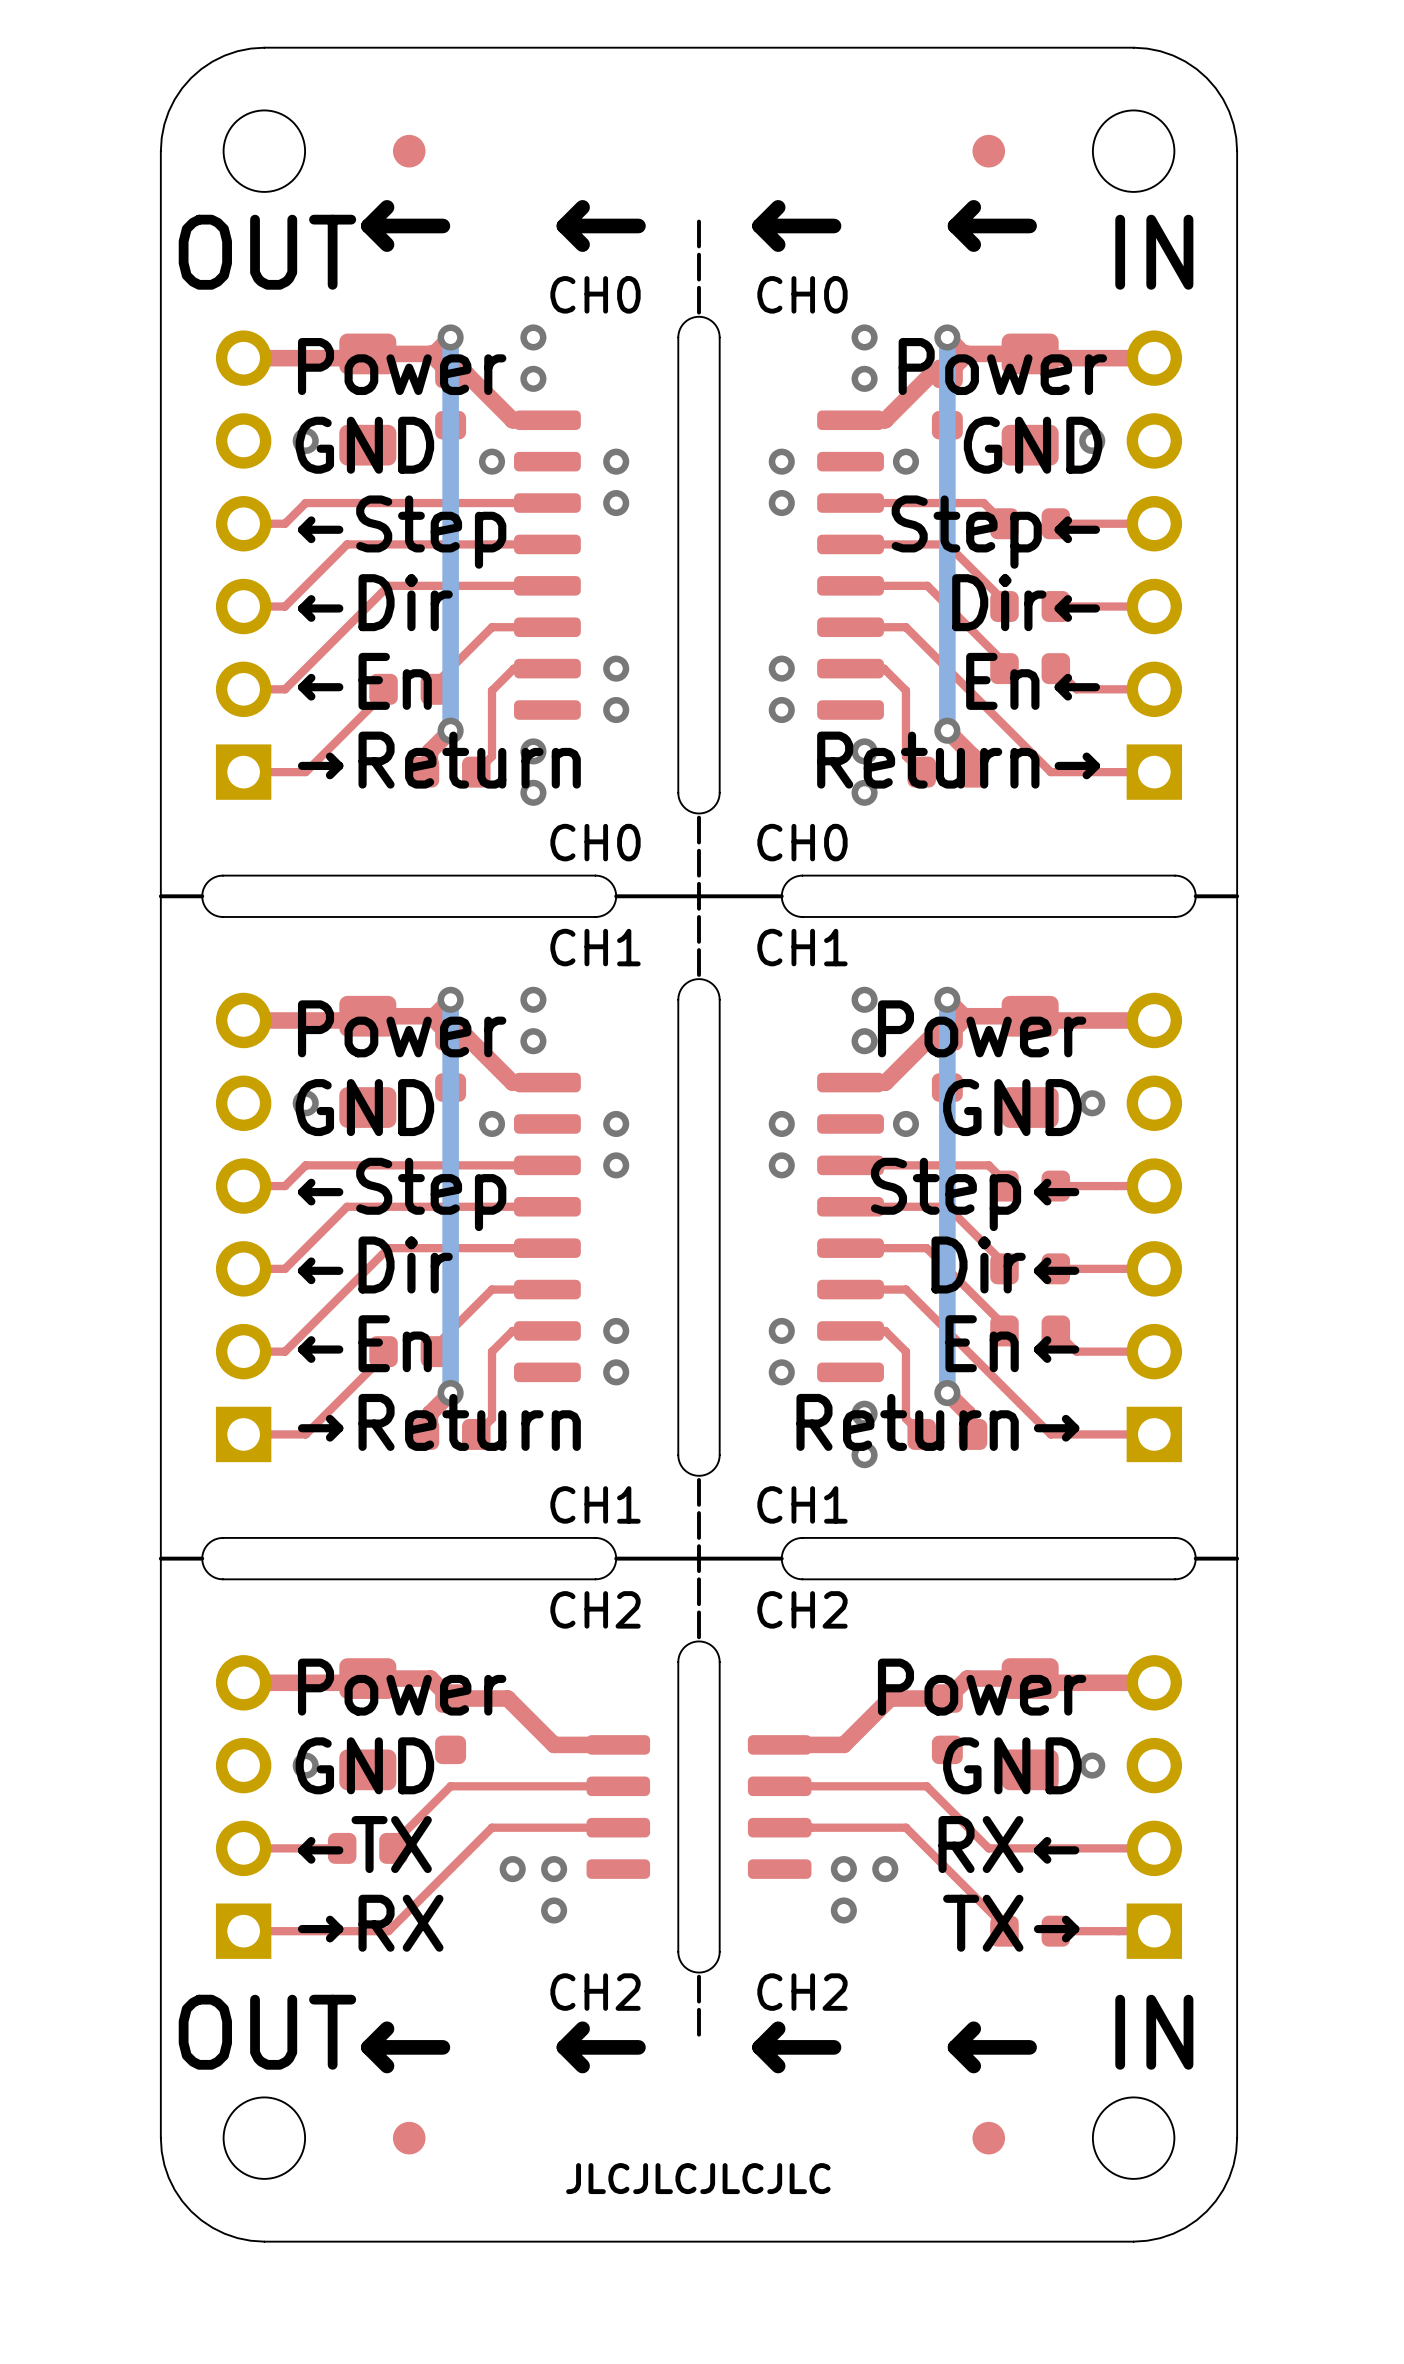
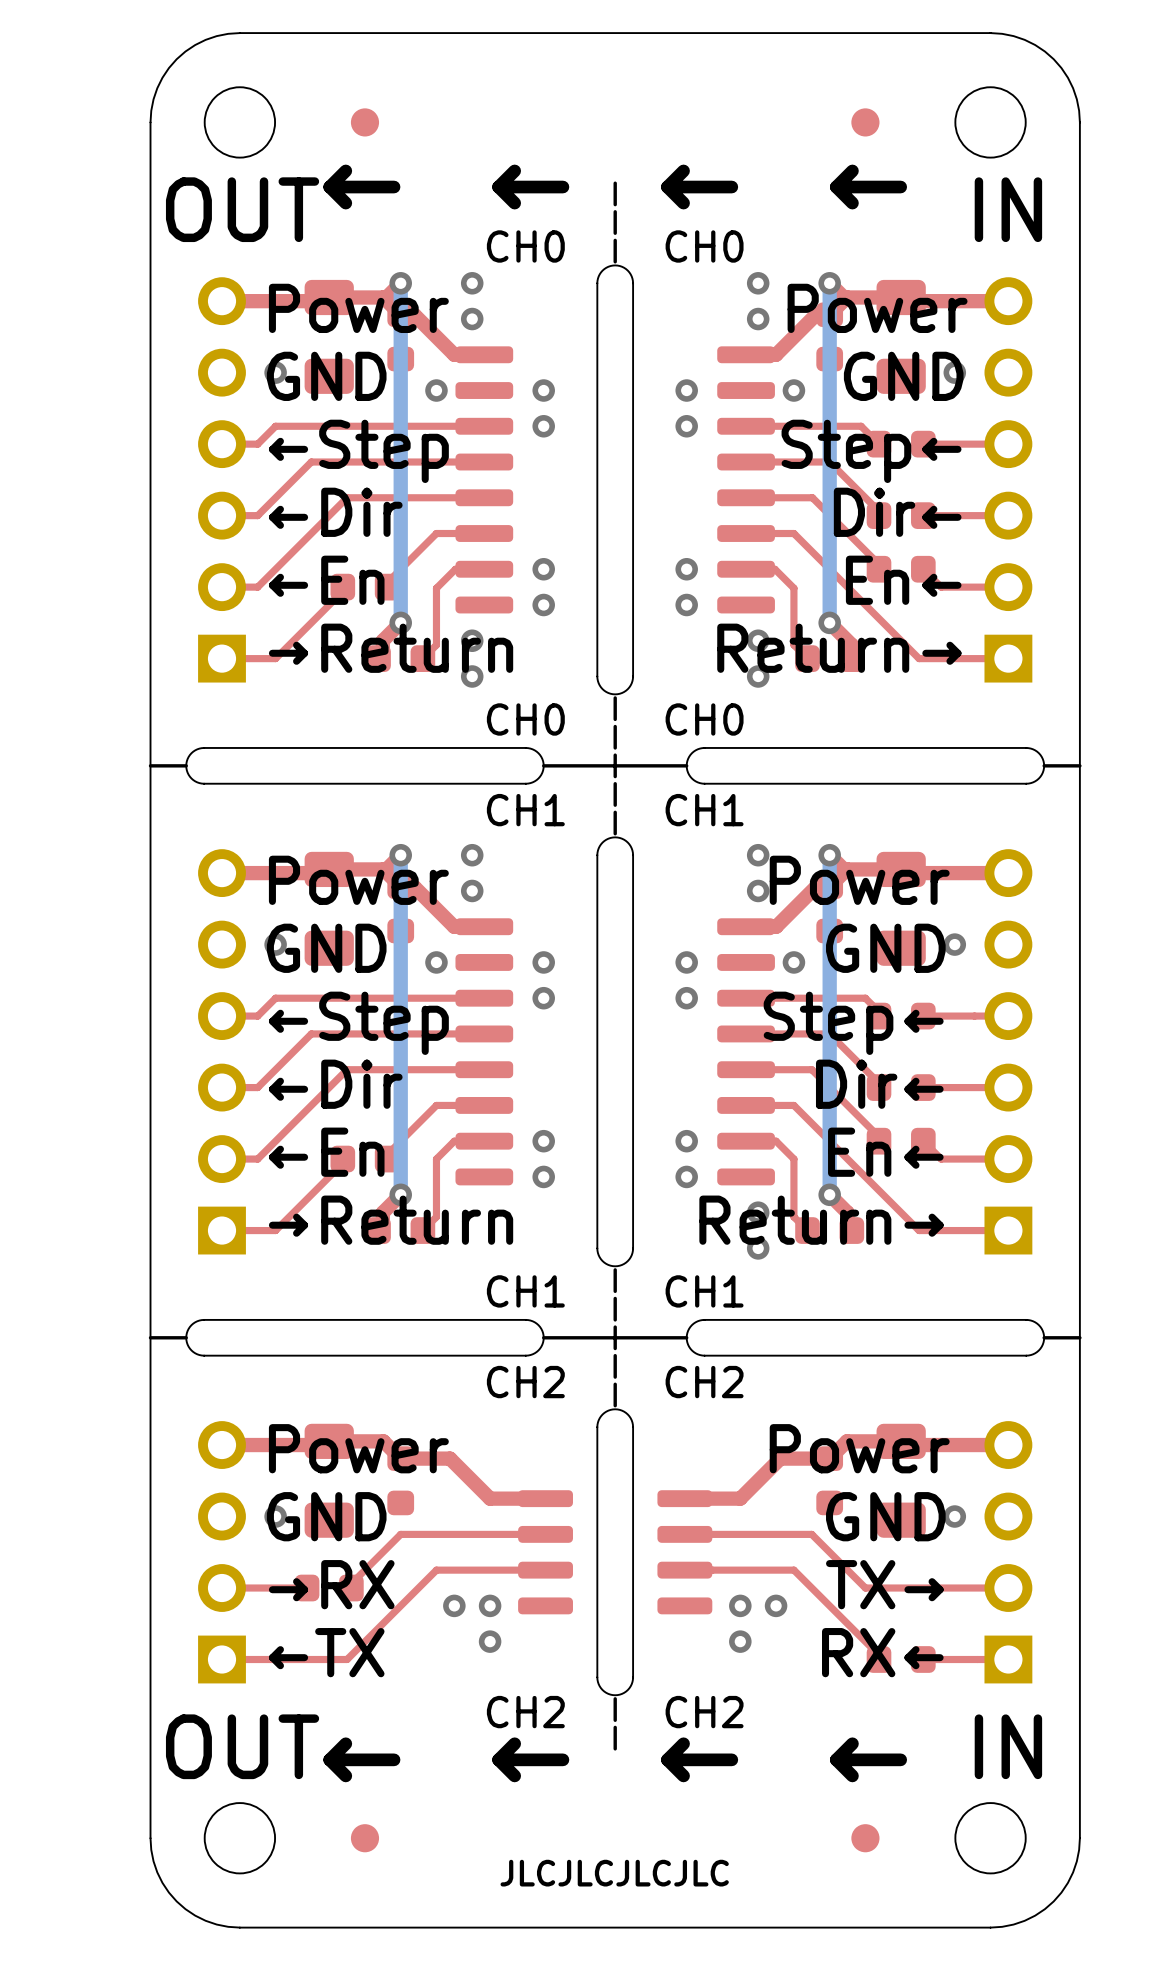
text: ←TX (364, 1844) -> →RX (331, 1584)
text: RX← (1008, 1844) -> TX→ (884, 1584)
text: →RX (370, 1923) -> ←TX (326, 1652)
text: TX→ (1011, 1923) -> RX← (882, 1652)

